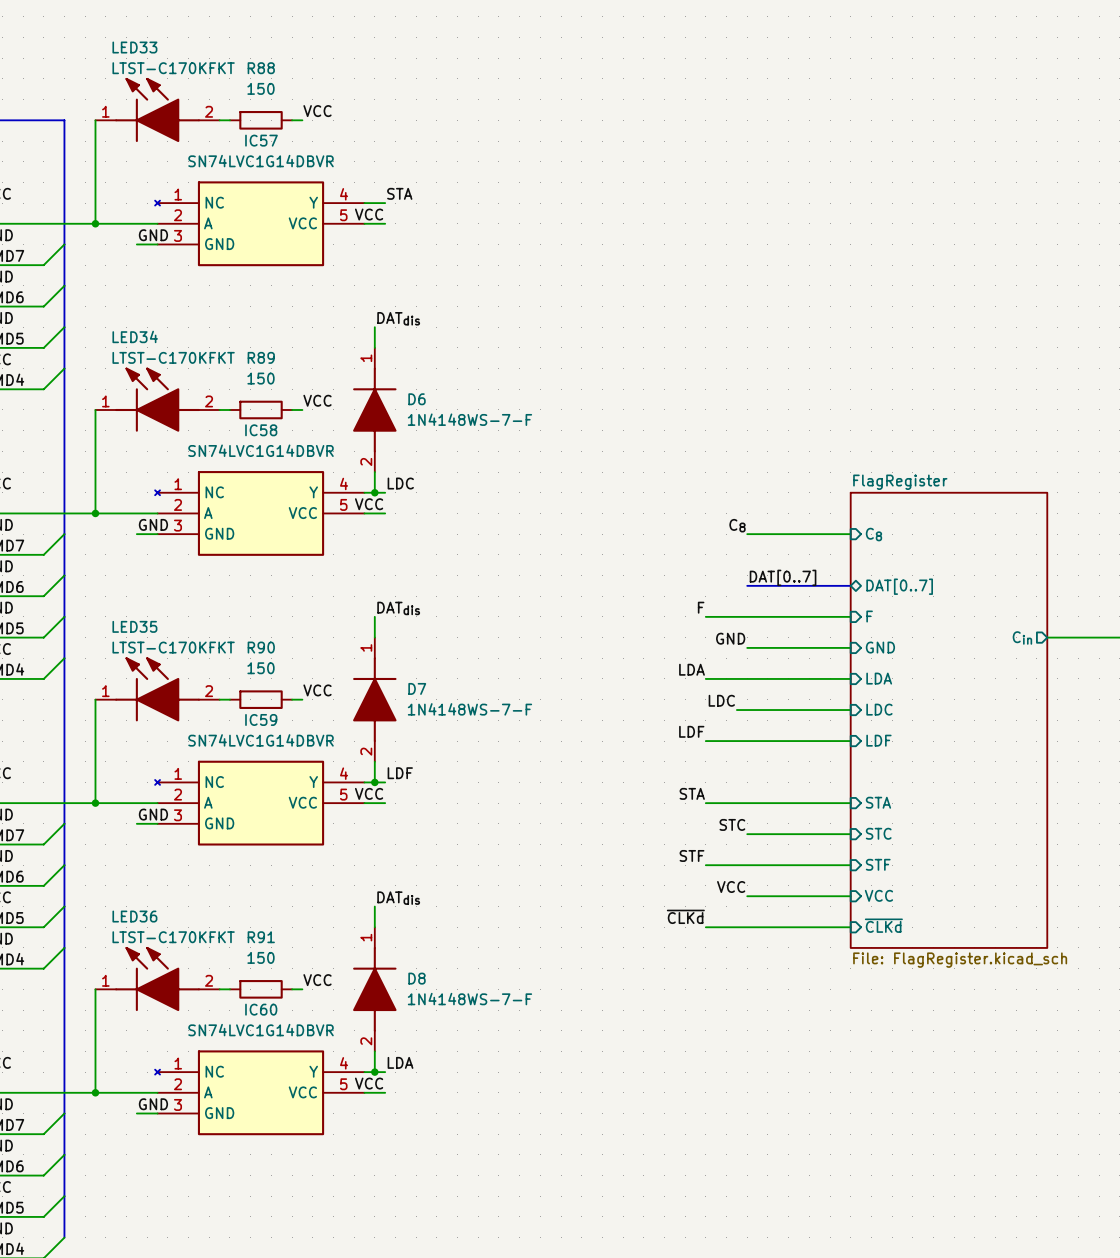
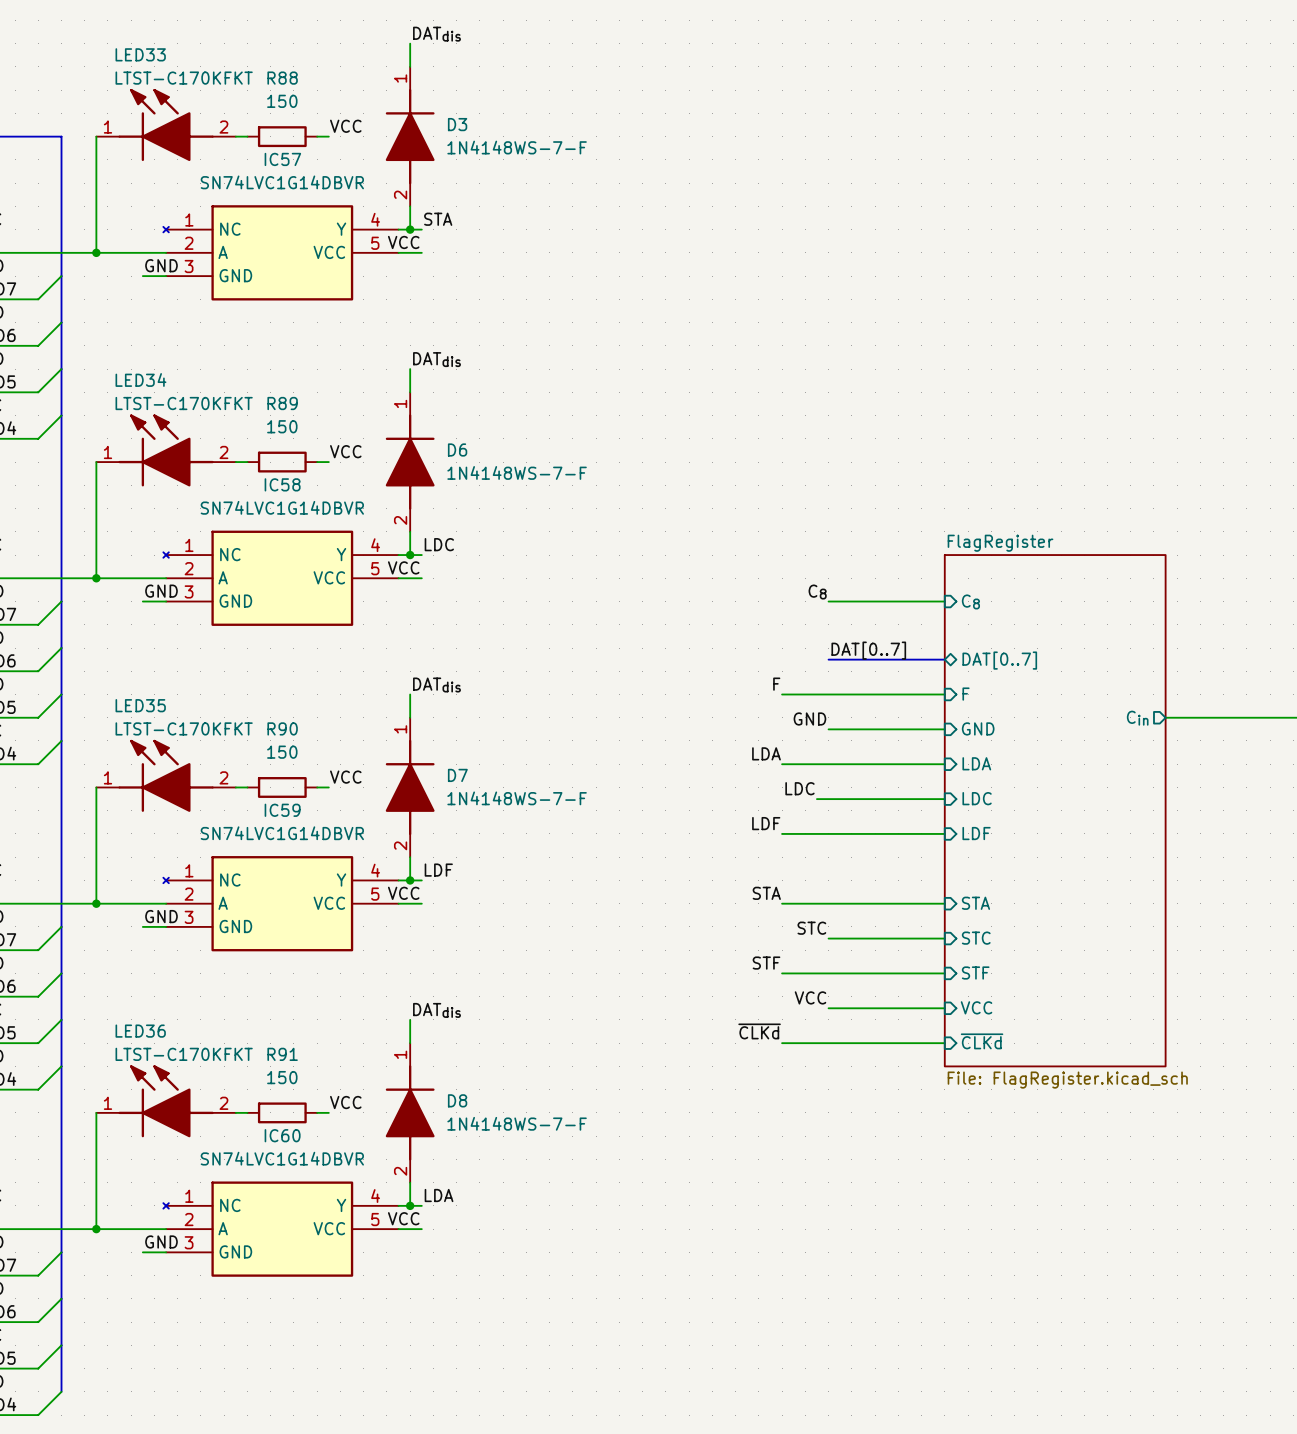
label: none -> DATdis (436, 34)
wire: none -> (410, 43) (410, 66)
D3: none -> 1N4148WS-7-F (410, 136)
wire: none -> (410, 206) (410, 229)
junction: none -> (410, 229)

